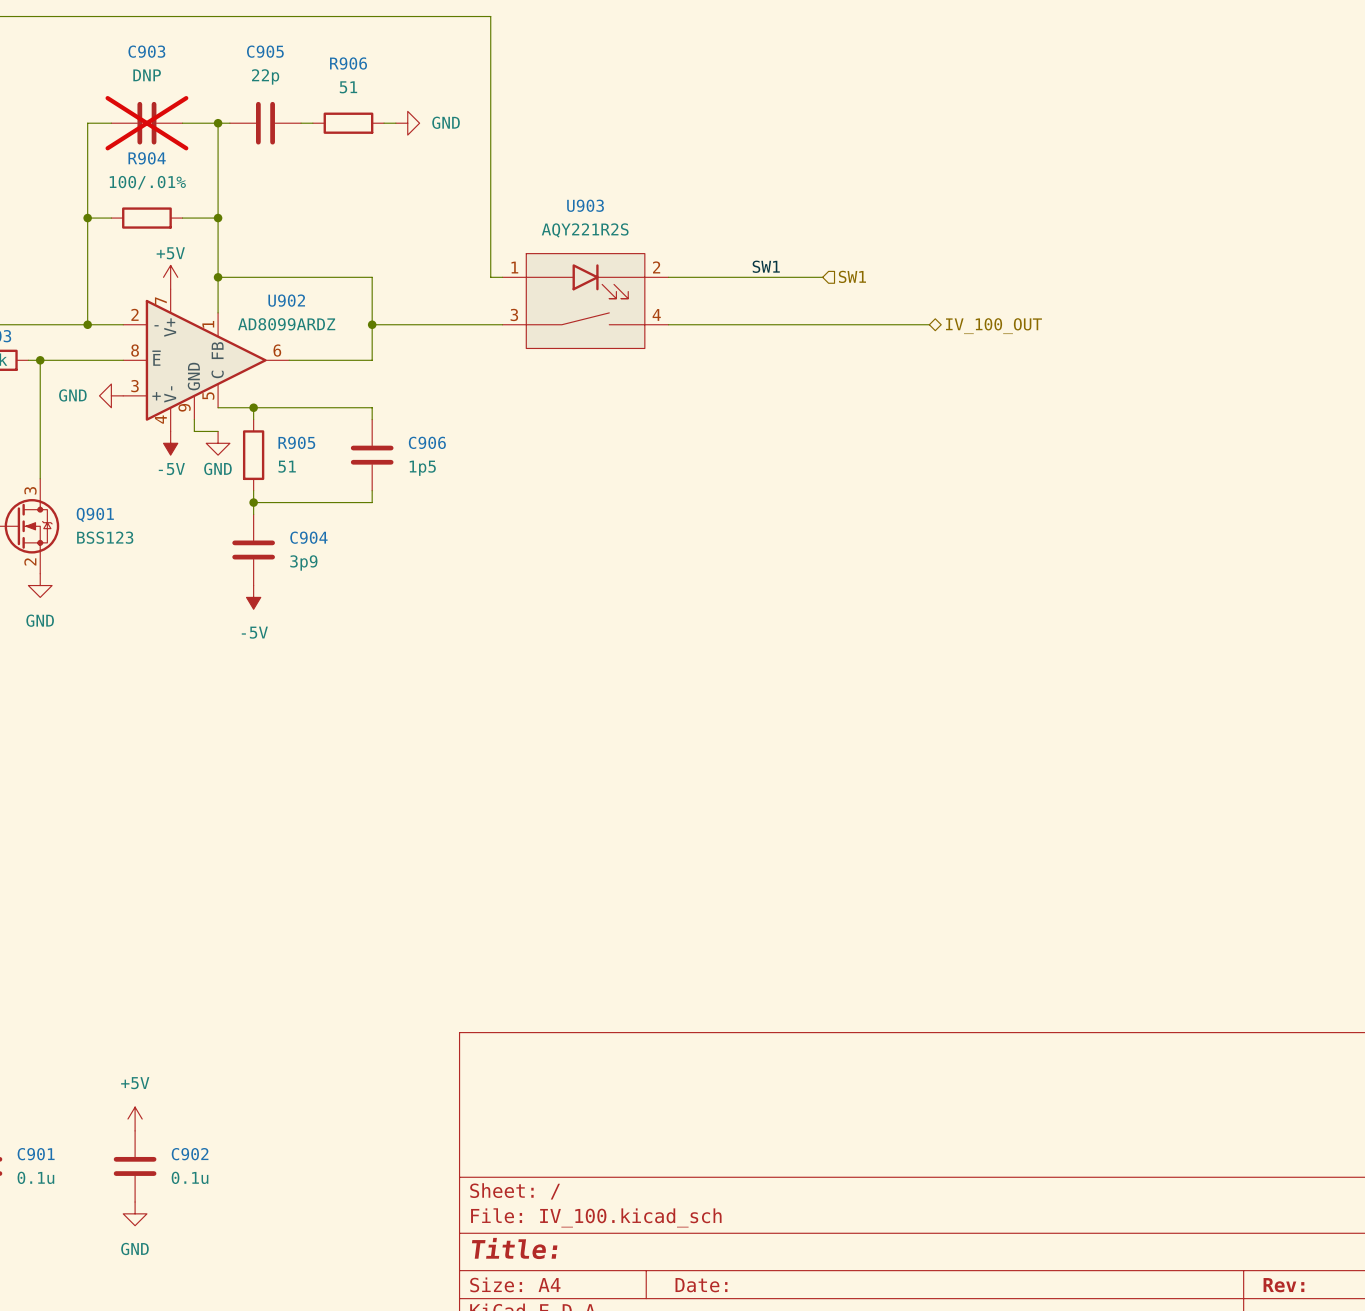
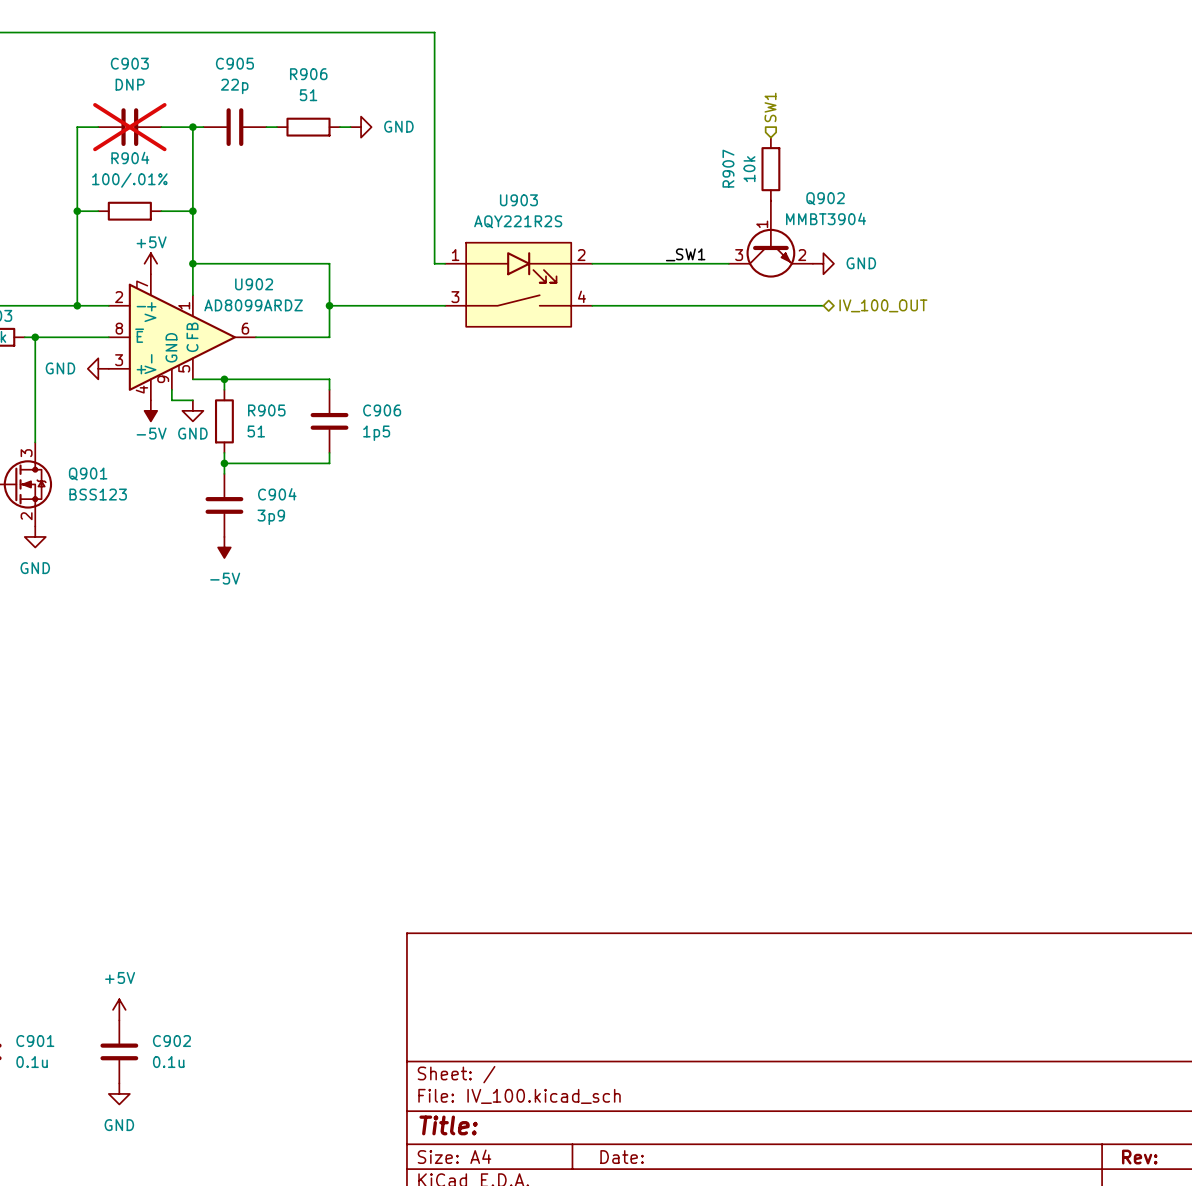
R907: none -> 10k (770, 169)
Q902: none -> MMBT3904 (770, 239)
label: SW1 (766, 266) -> _SW1 (685, 254)
hierarchical label rotation: 0° (852, 276) -> 90° counterclockwise (770, 107)
hierarchical label position: SW1 (852, 276) -> SW1 (770, 107)
power symbol: none -> GND (823, 263)

